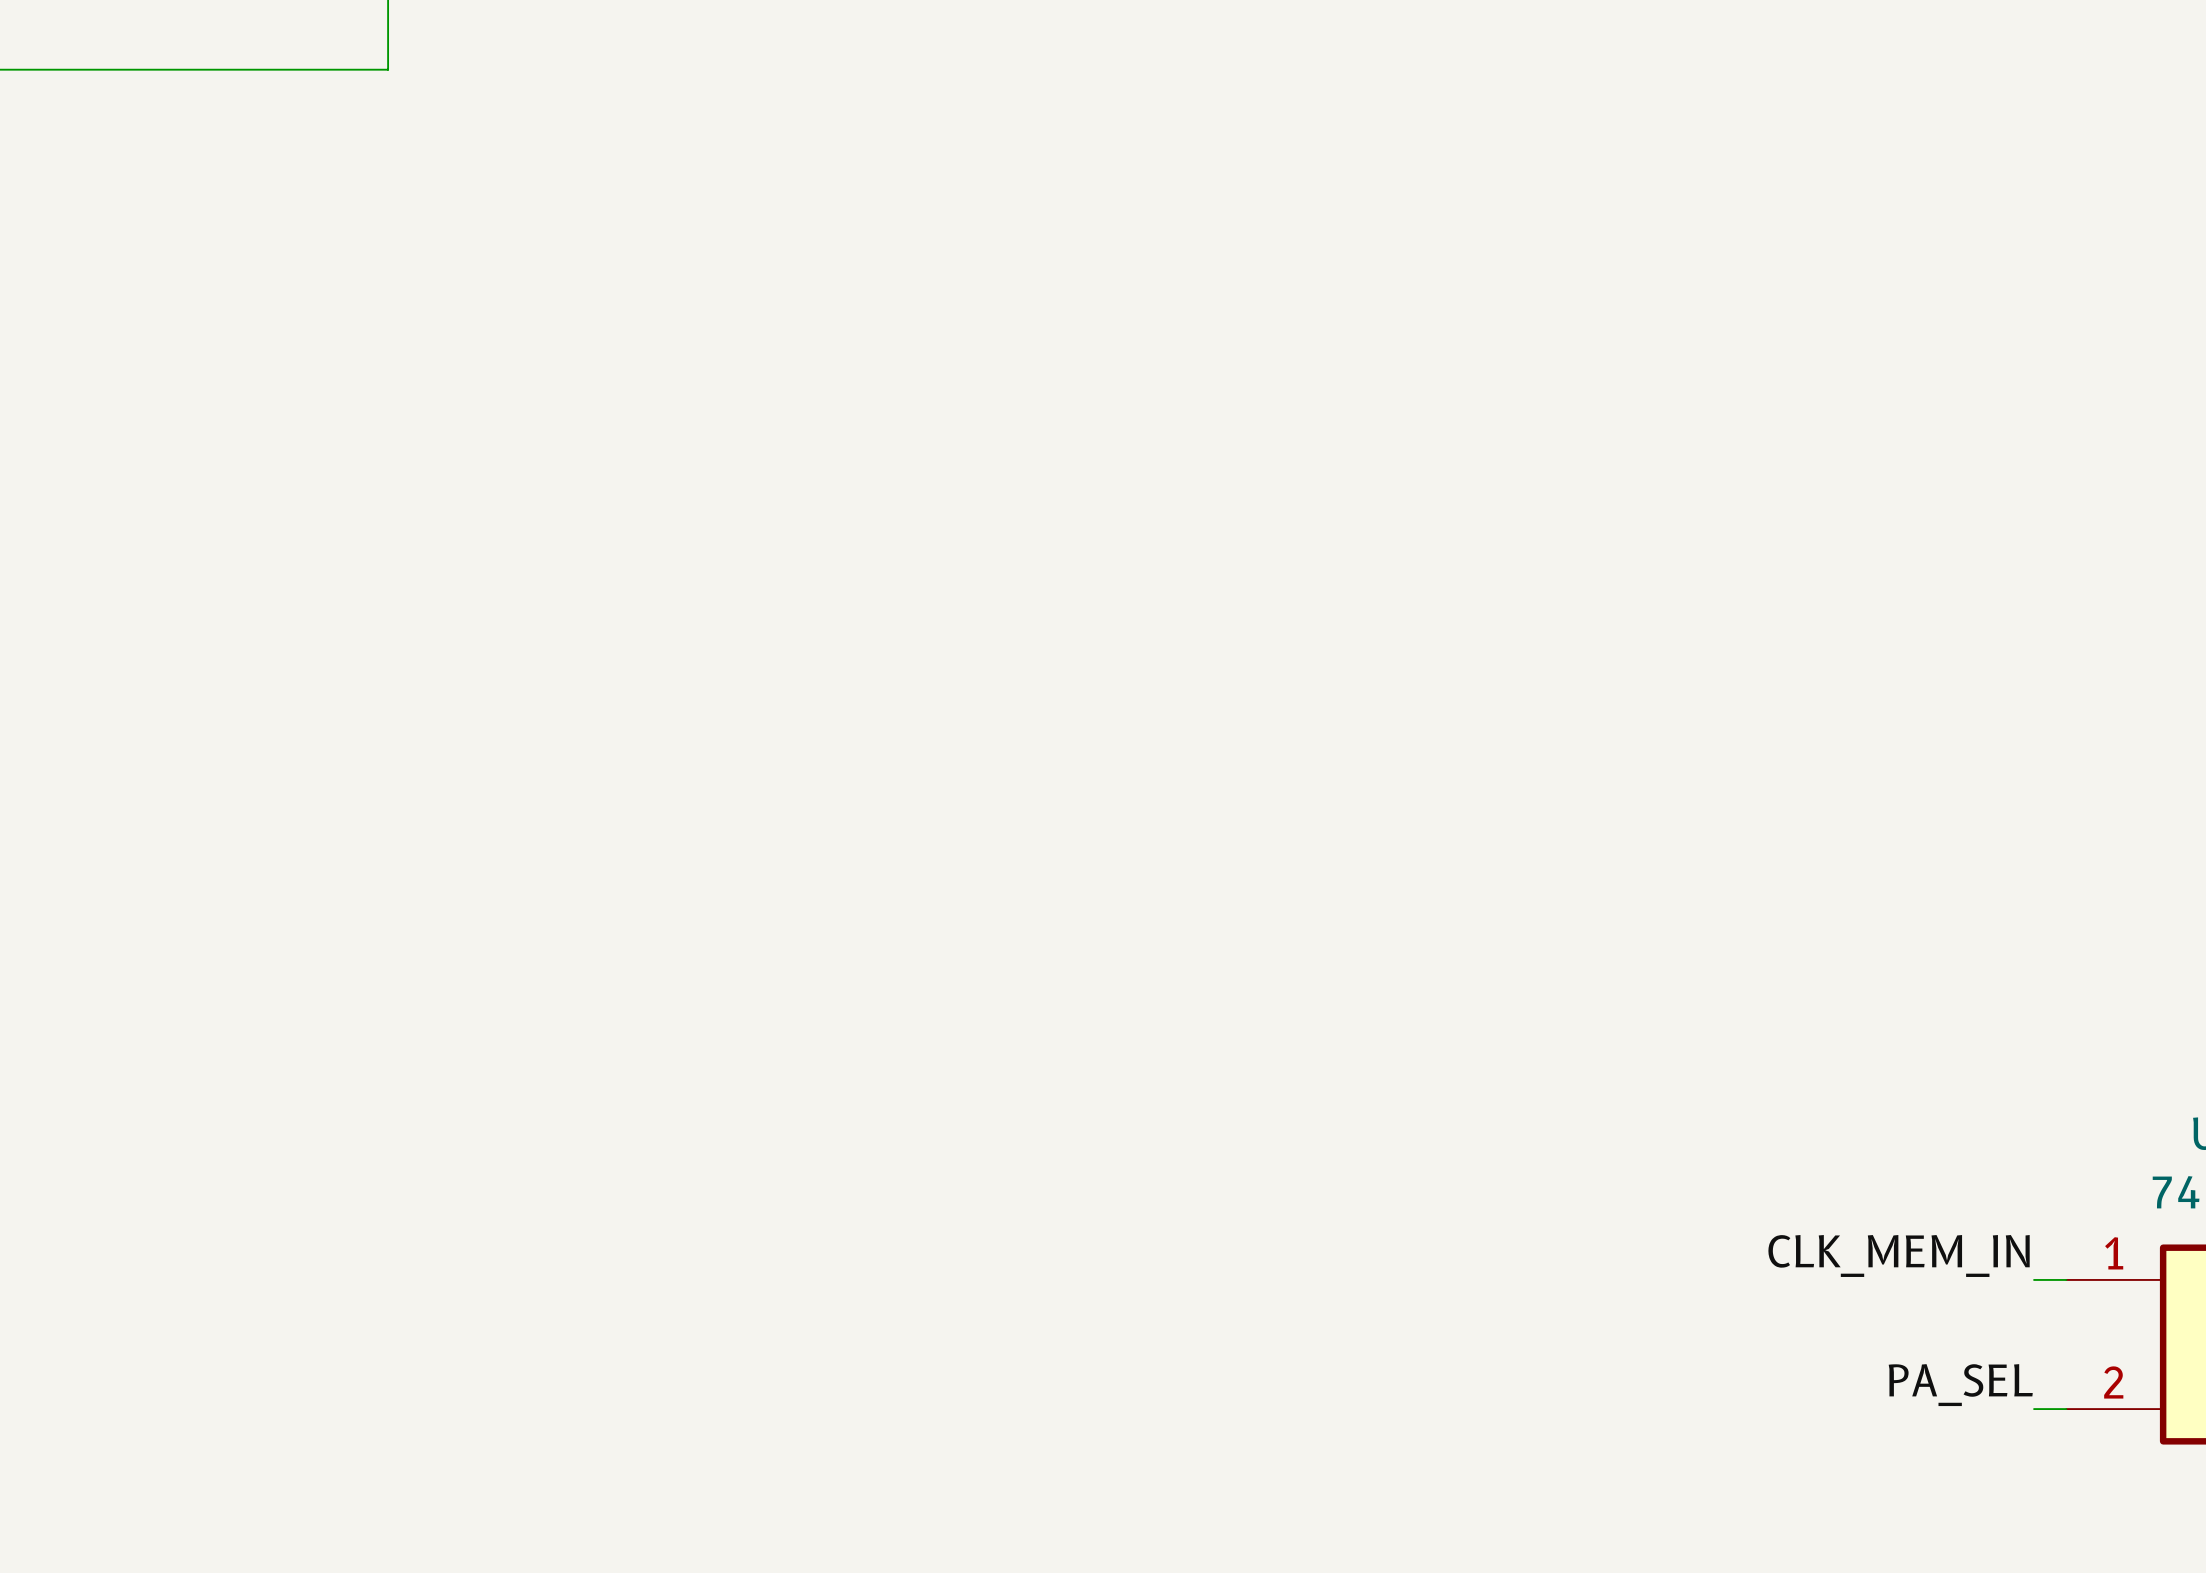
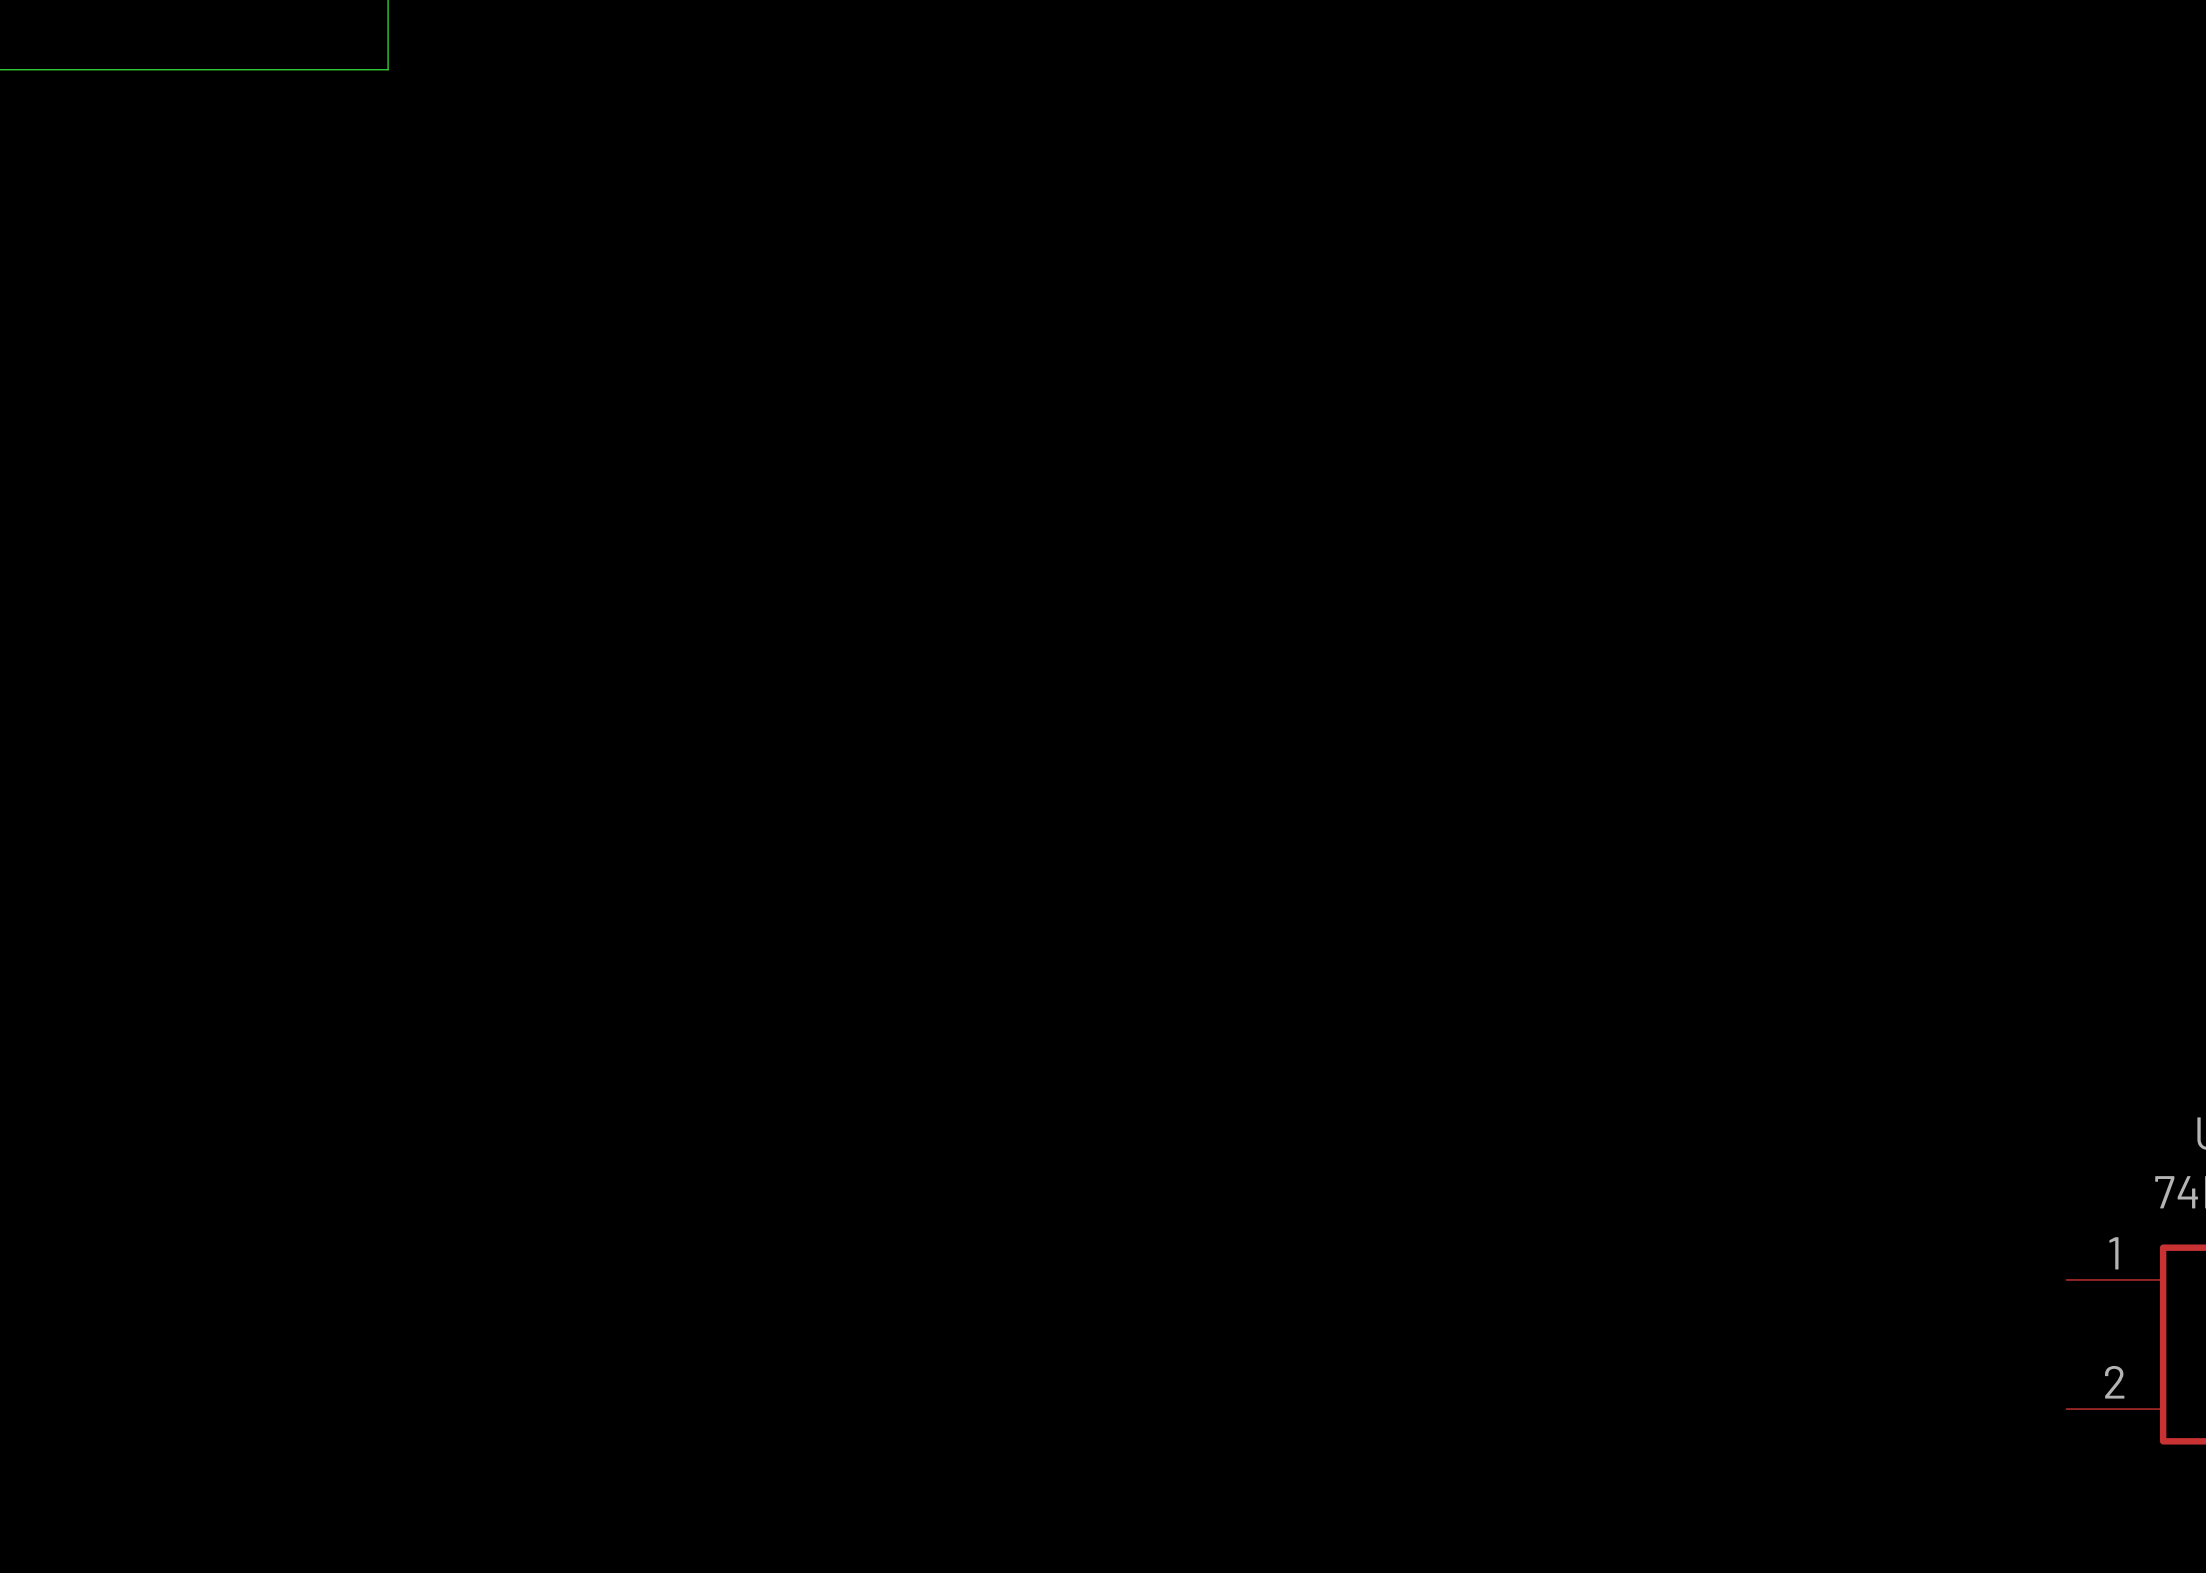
label: CLK_MEM_IN (1899, 1256) -> none
wire: (2034, 1279) (2066, 1279) -> none
label: PA_SEL (1960, 1385) -> none
wire: (2034, 1409) (2066, 1409) -> none

